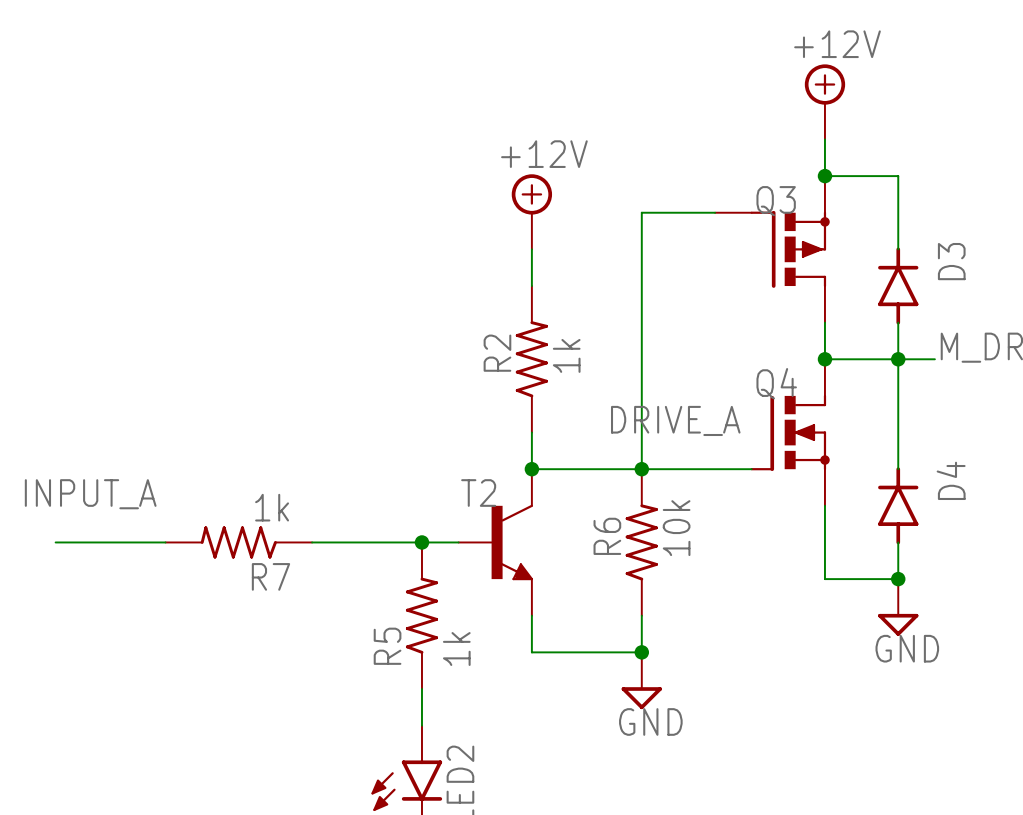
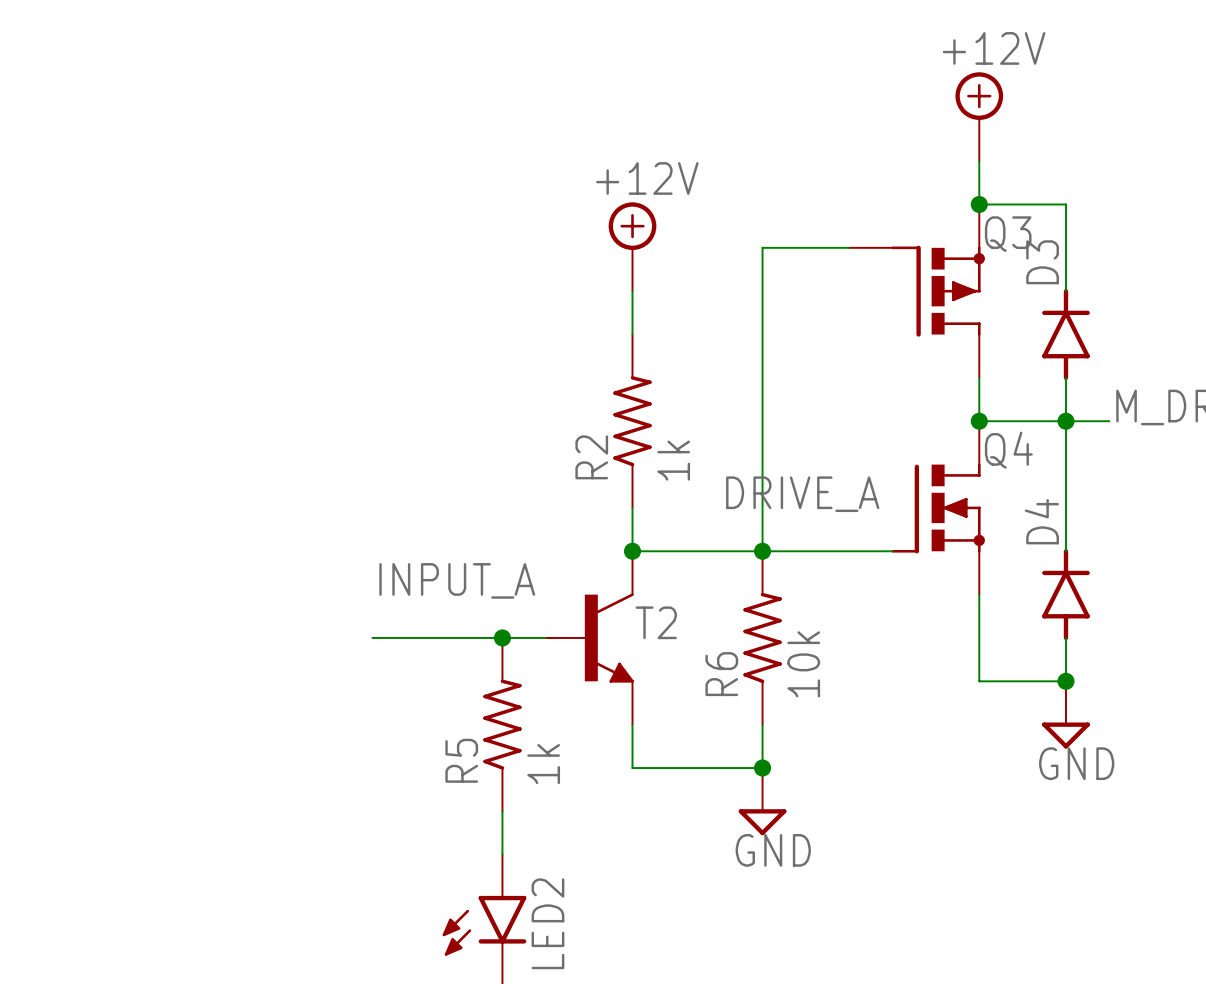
Q3 name position: Q3 (776, 201) -> Q3 (1008, 234)
D3 name position: D3 (951, 261) -> D3 (1042, 262)
R2 name position: R2 (497, 353) -> R2 (591, 457)
R2 value position: 1k (566, 355) -> 1k (673, 460)
Q4 name position: Q4 (776, 383) -> Q4 (1008, 450)
D4 name position: D4 (951, 480) -> D4 (1041, 521)
T2 name position: T2 (478, 493) -> T2 (656, 622)
label position: INPUT_A (90, 494) -> INPUT_A (457, 580)
R6 value position: 10k (676, 528) -> 10k (803, 664)
R6 name position: R6 (607, 536) -> R6 (721, 674)
wire: (55, 542) (165, 542) -> none
R7: 1k (238, 542) -> none

